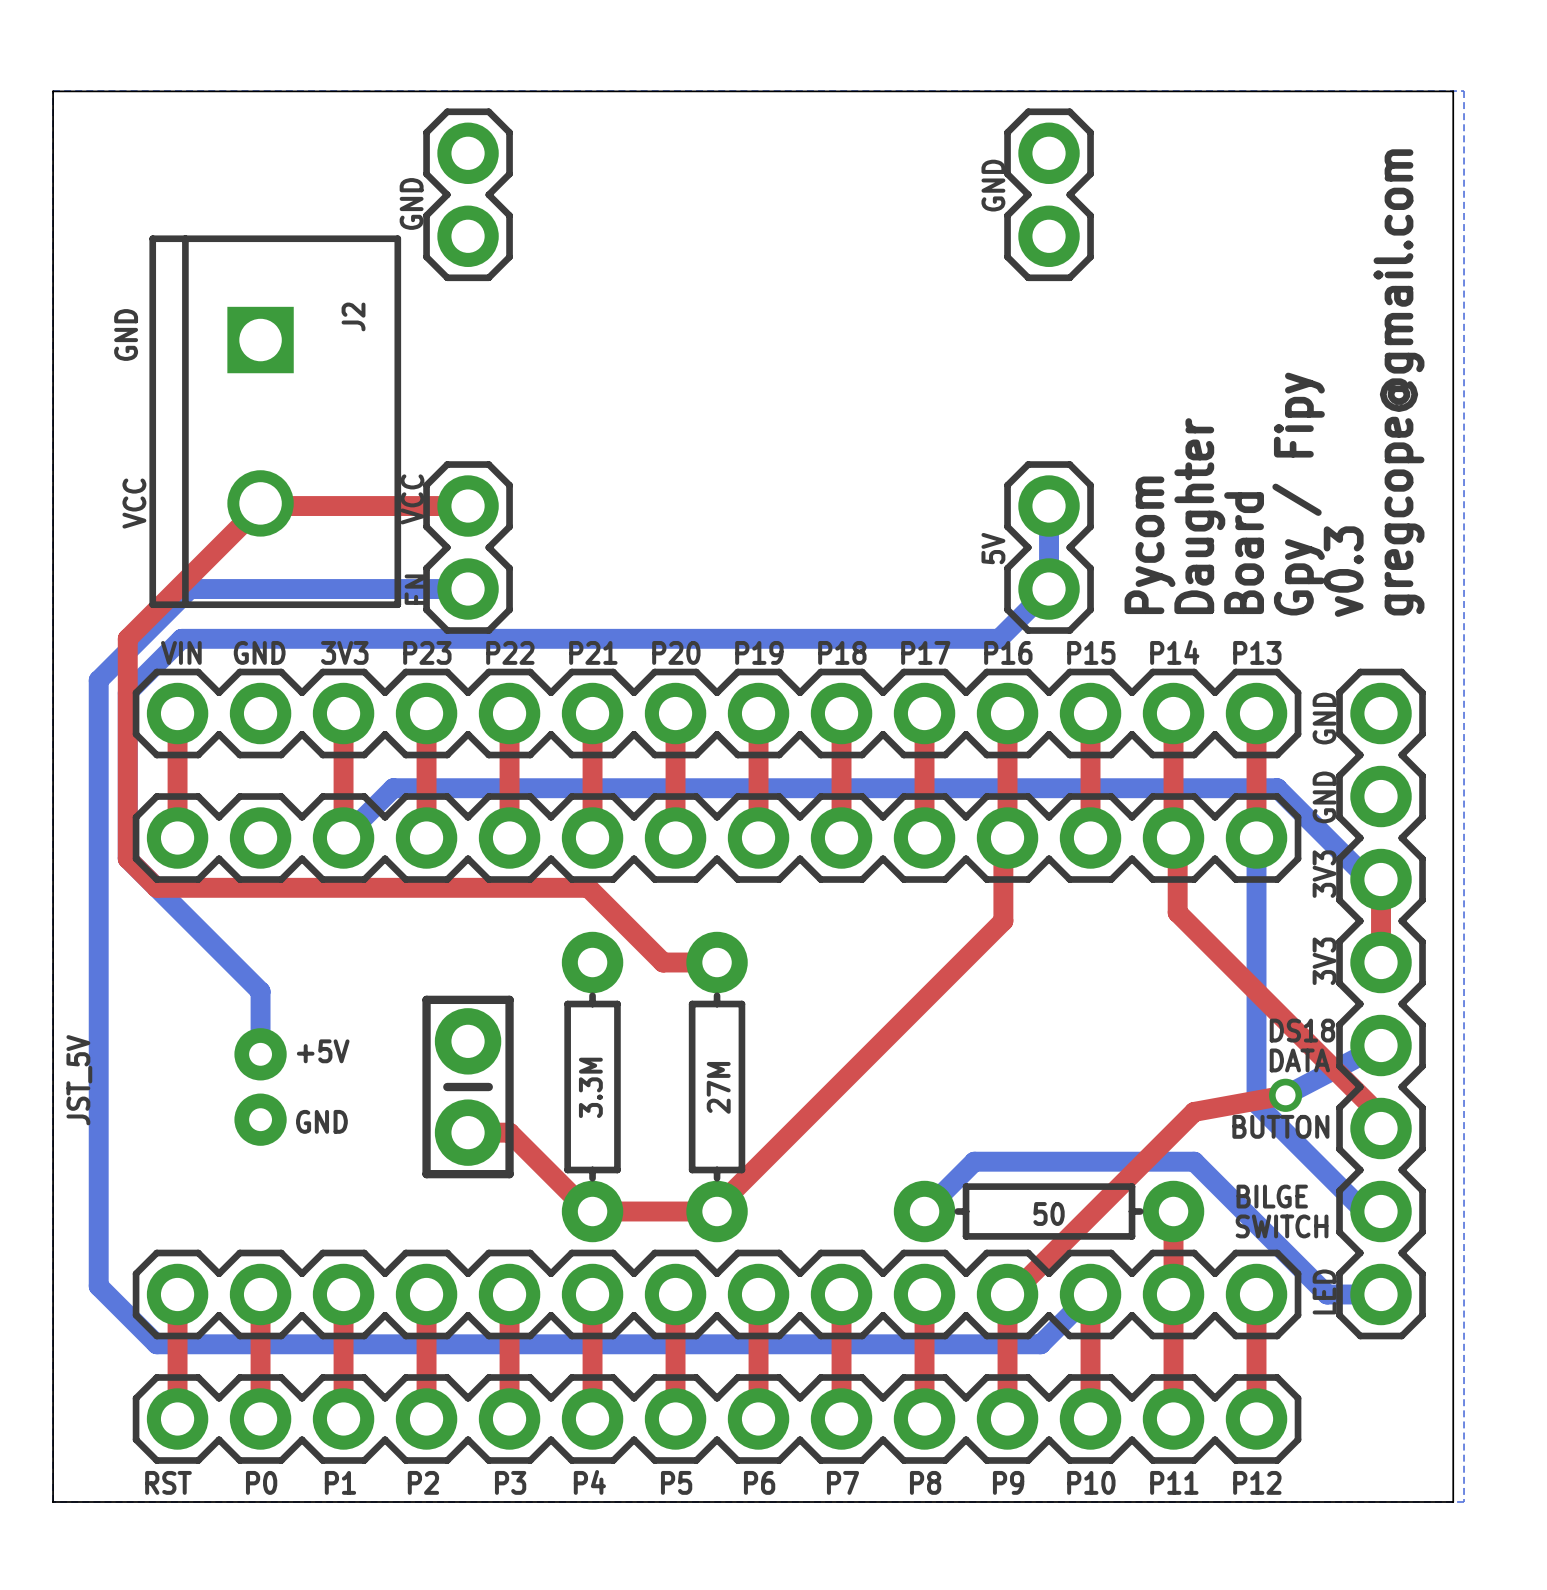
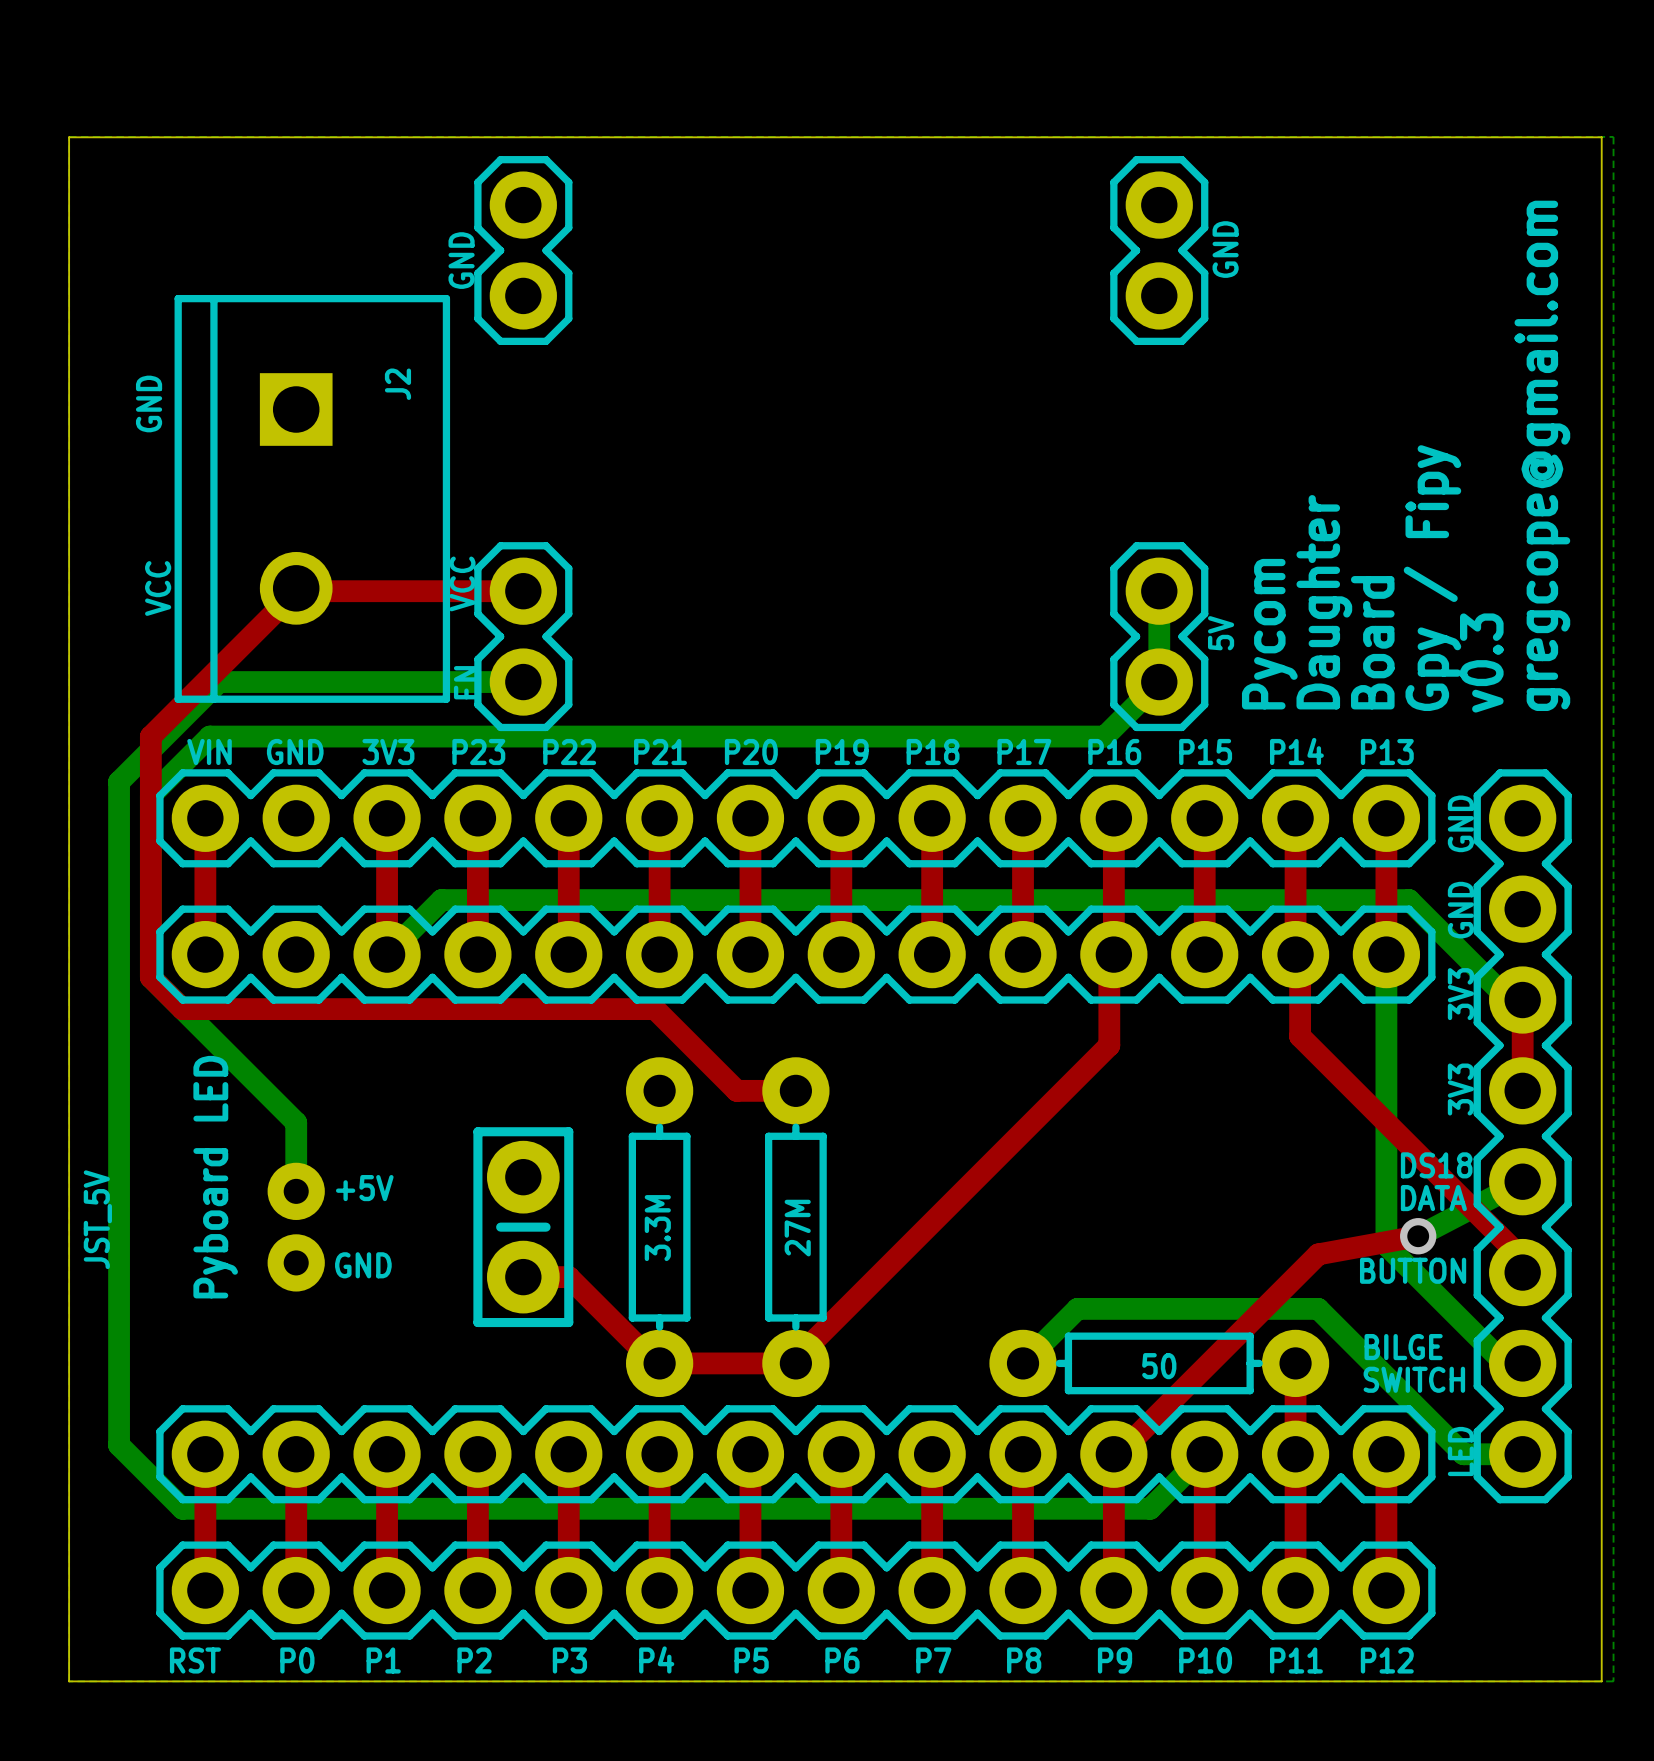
GND name position: GND (993, 185) -> GND (1225, 249)
5V name position: 5V (993, 548) -> 5V (1221, 633)
text: none -> Pyboard LED (215, 1177)

